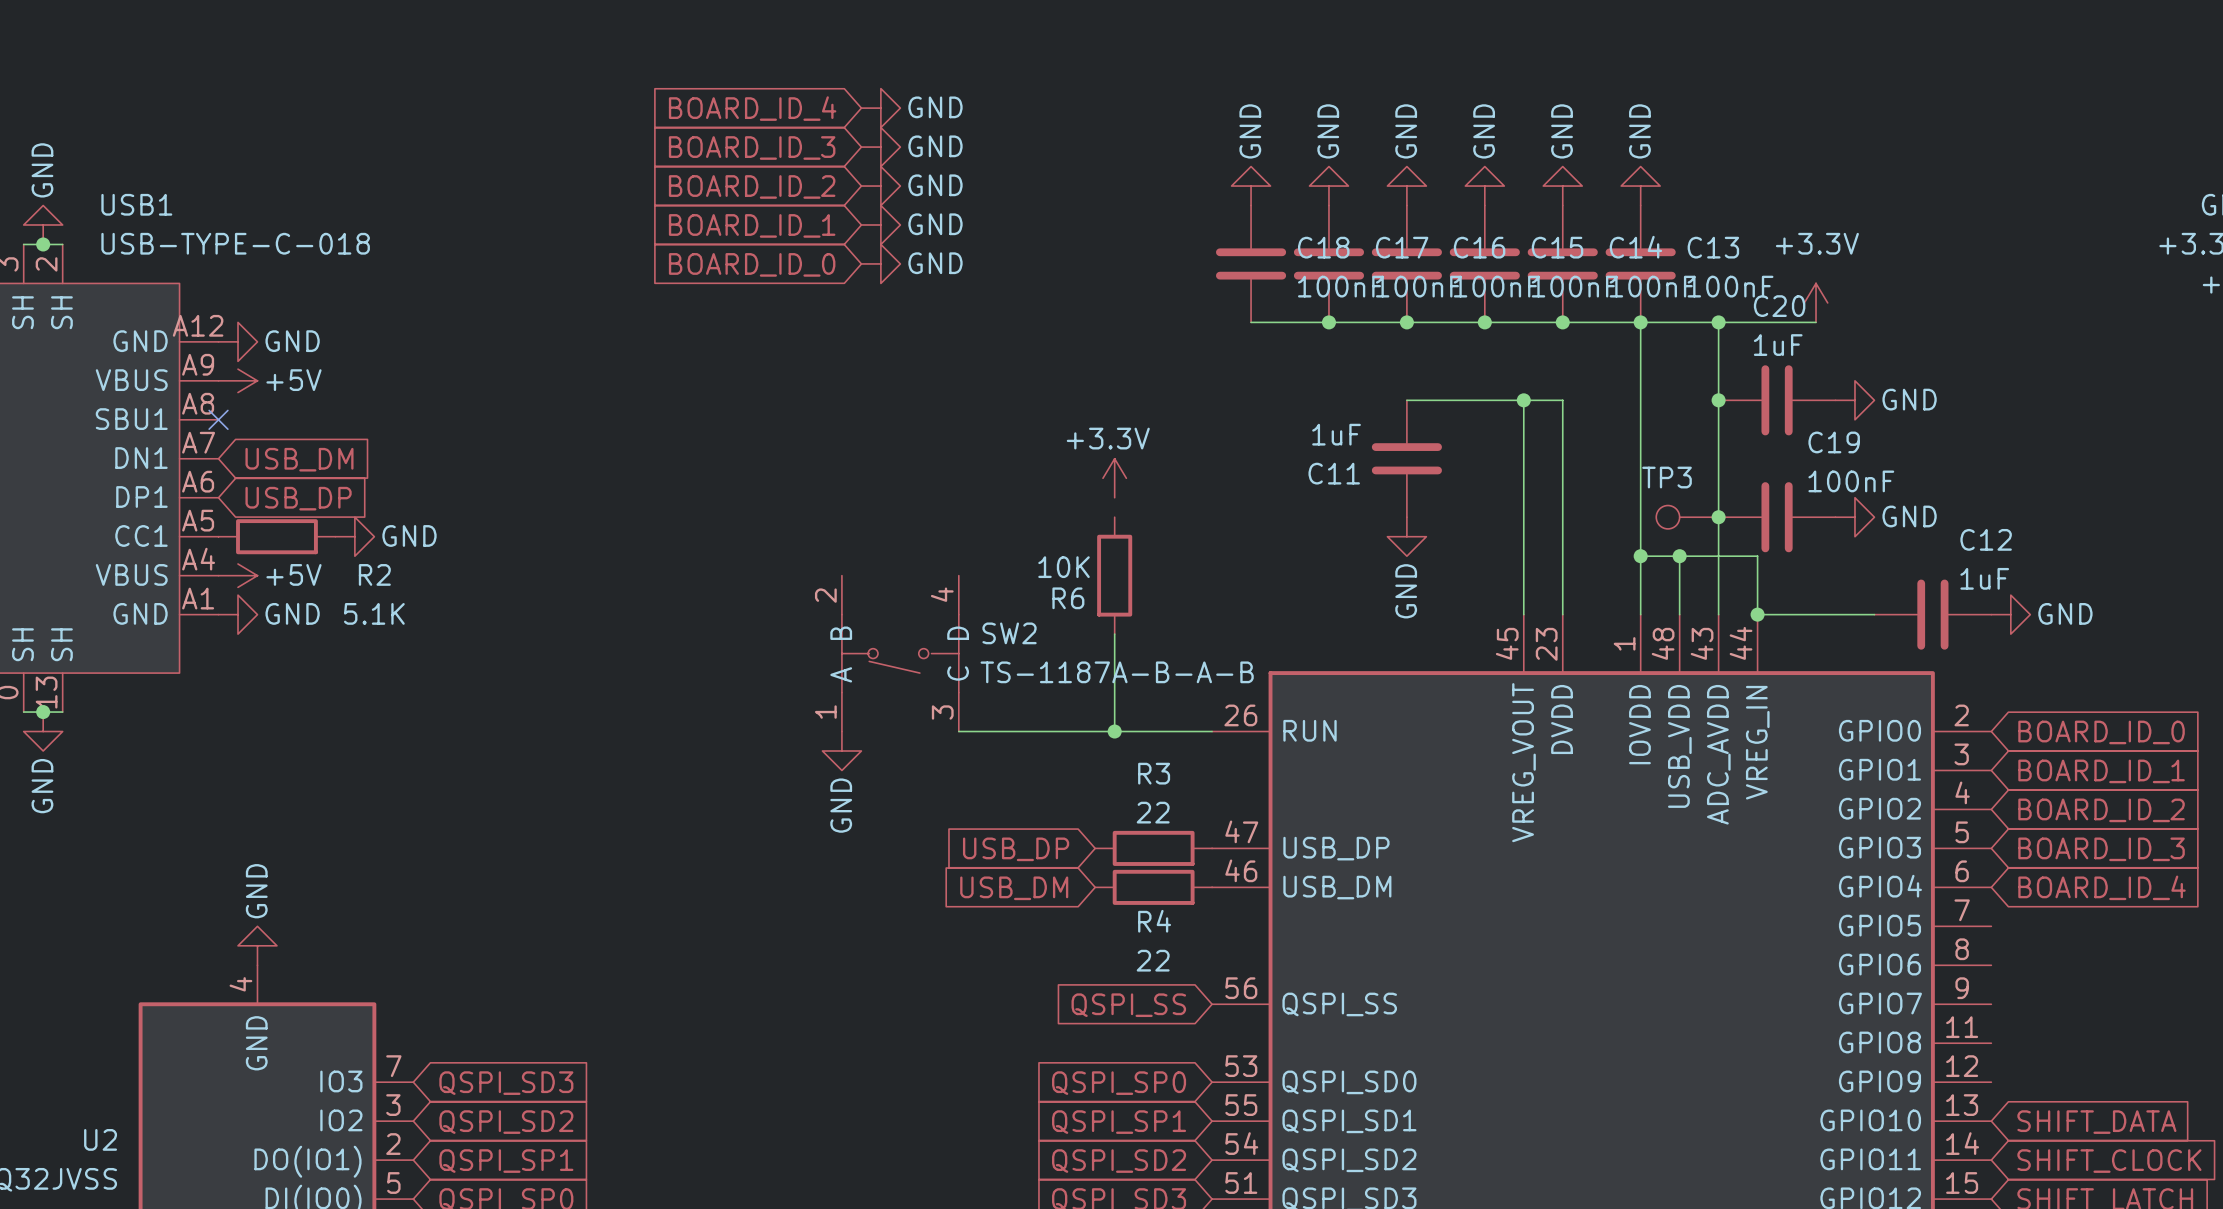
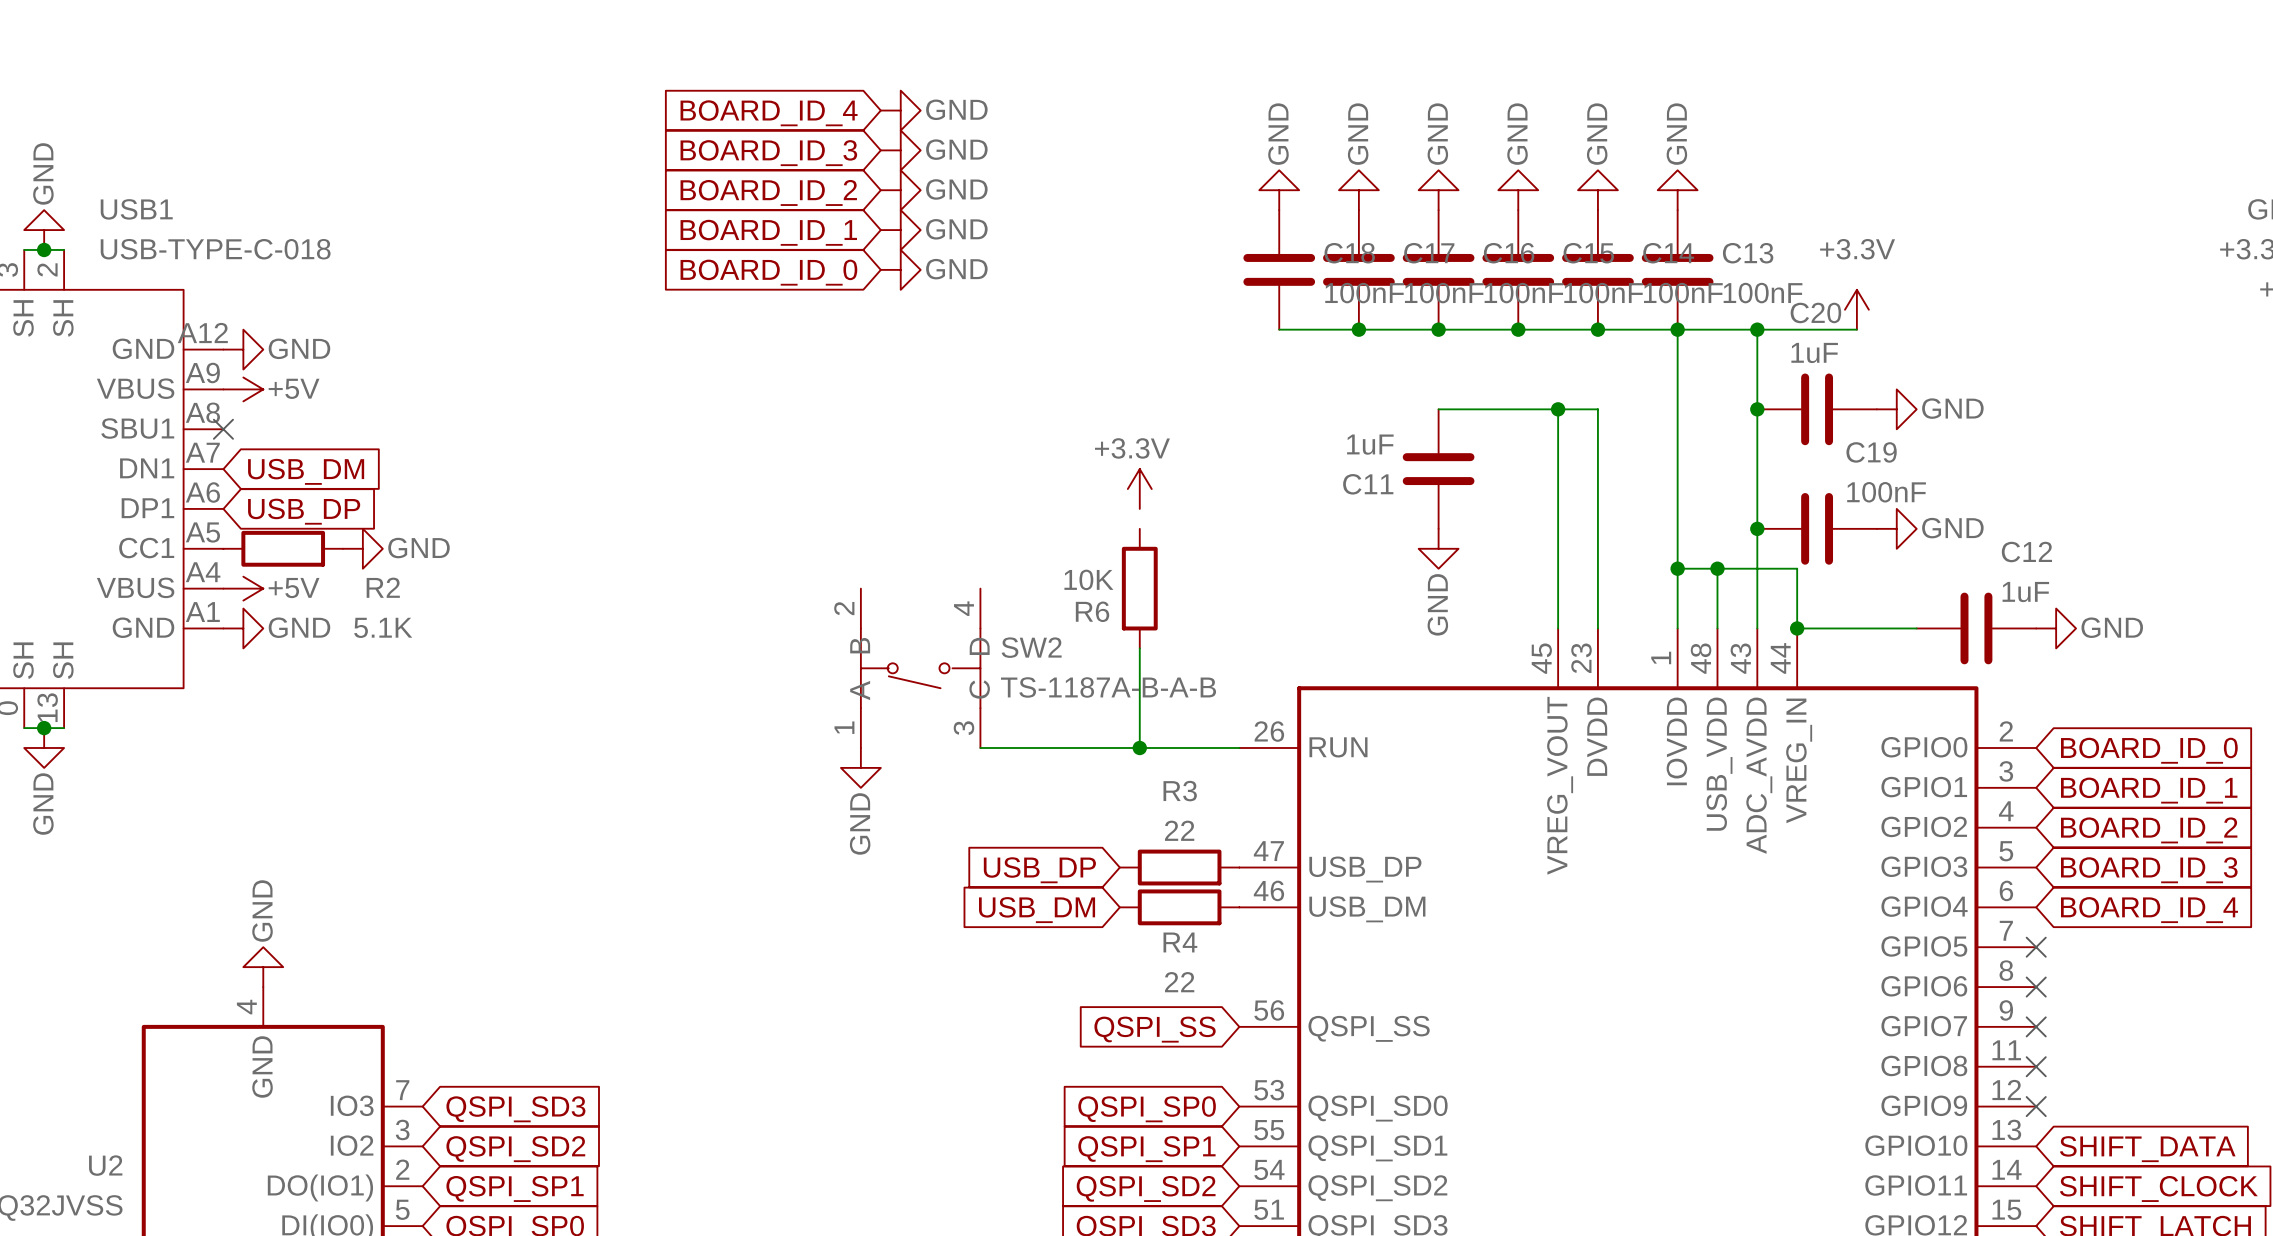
TP3: (1687, 517) -> none
no-connect mark: none -> (2036, 947)
no-connect mark: none -> (2036, 987)
no-connect mark: none -> (2036, 1026)
no-connect mark: none -> (2036, 1066)
no-connect mark: none -> (2036, 1106)

